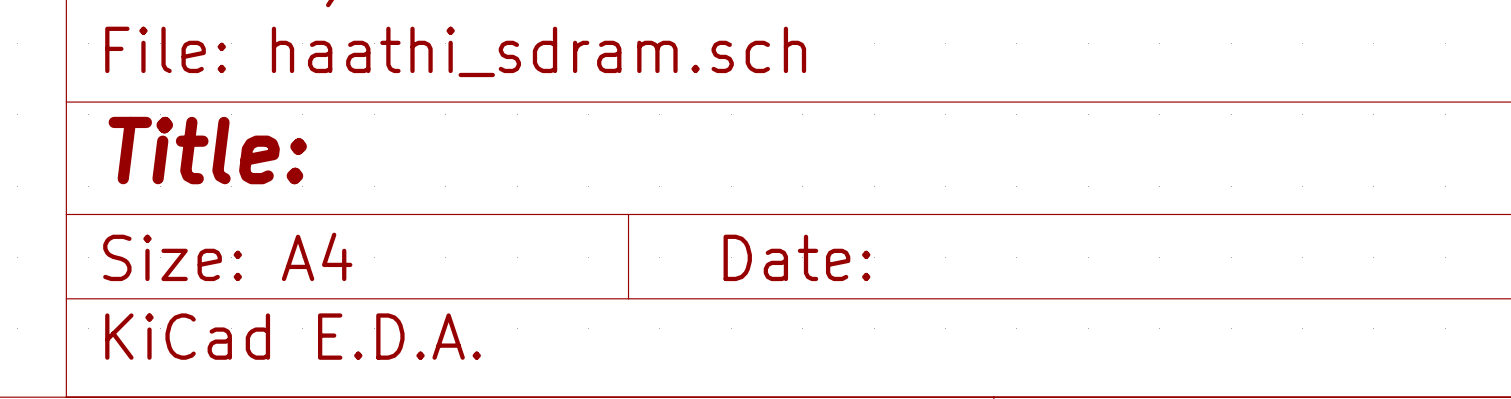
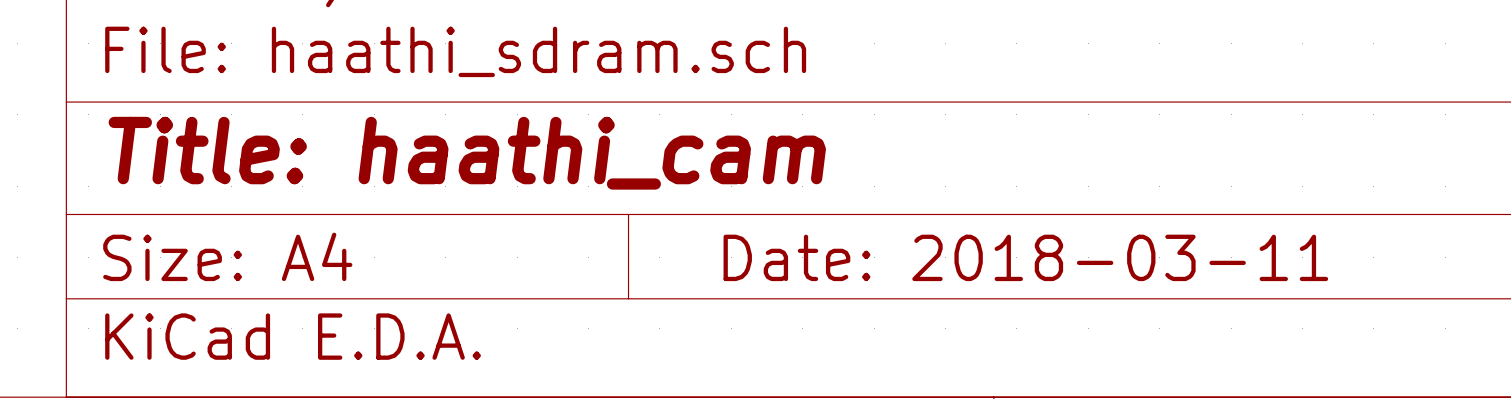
title block: Title: (207, 150) -> Title: haathi_cam (467, 153)
title block: Date: (796, 257) -> Date: 2018-03-11 (1025, 257)

